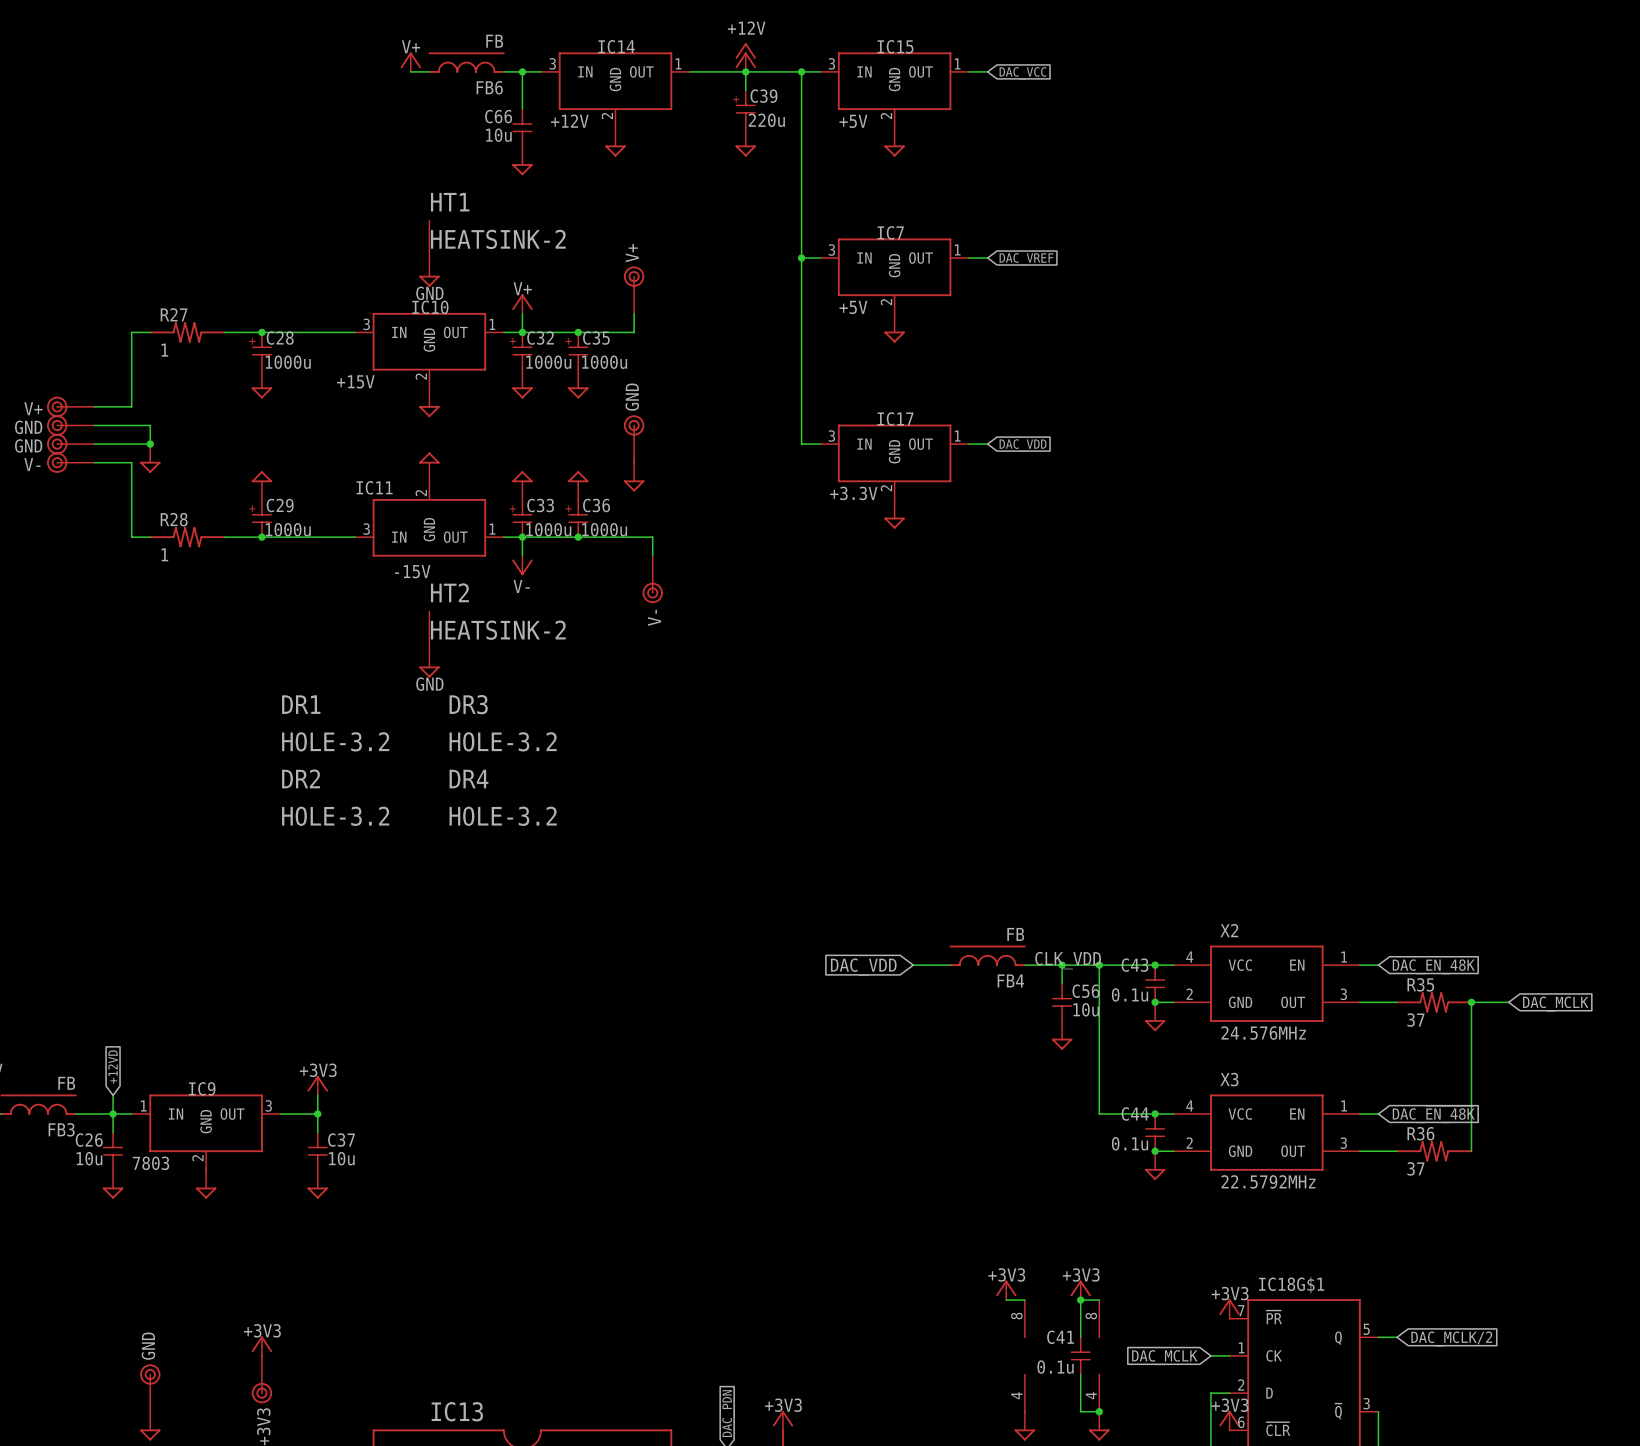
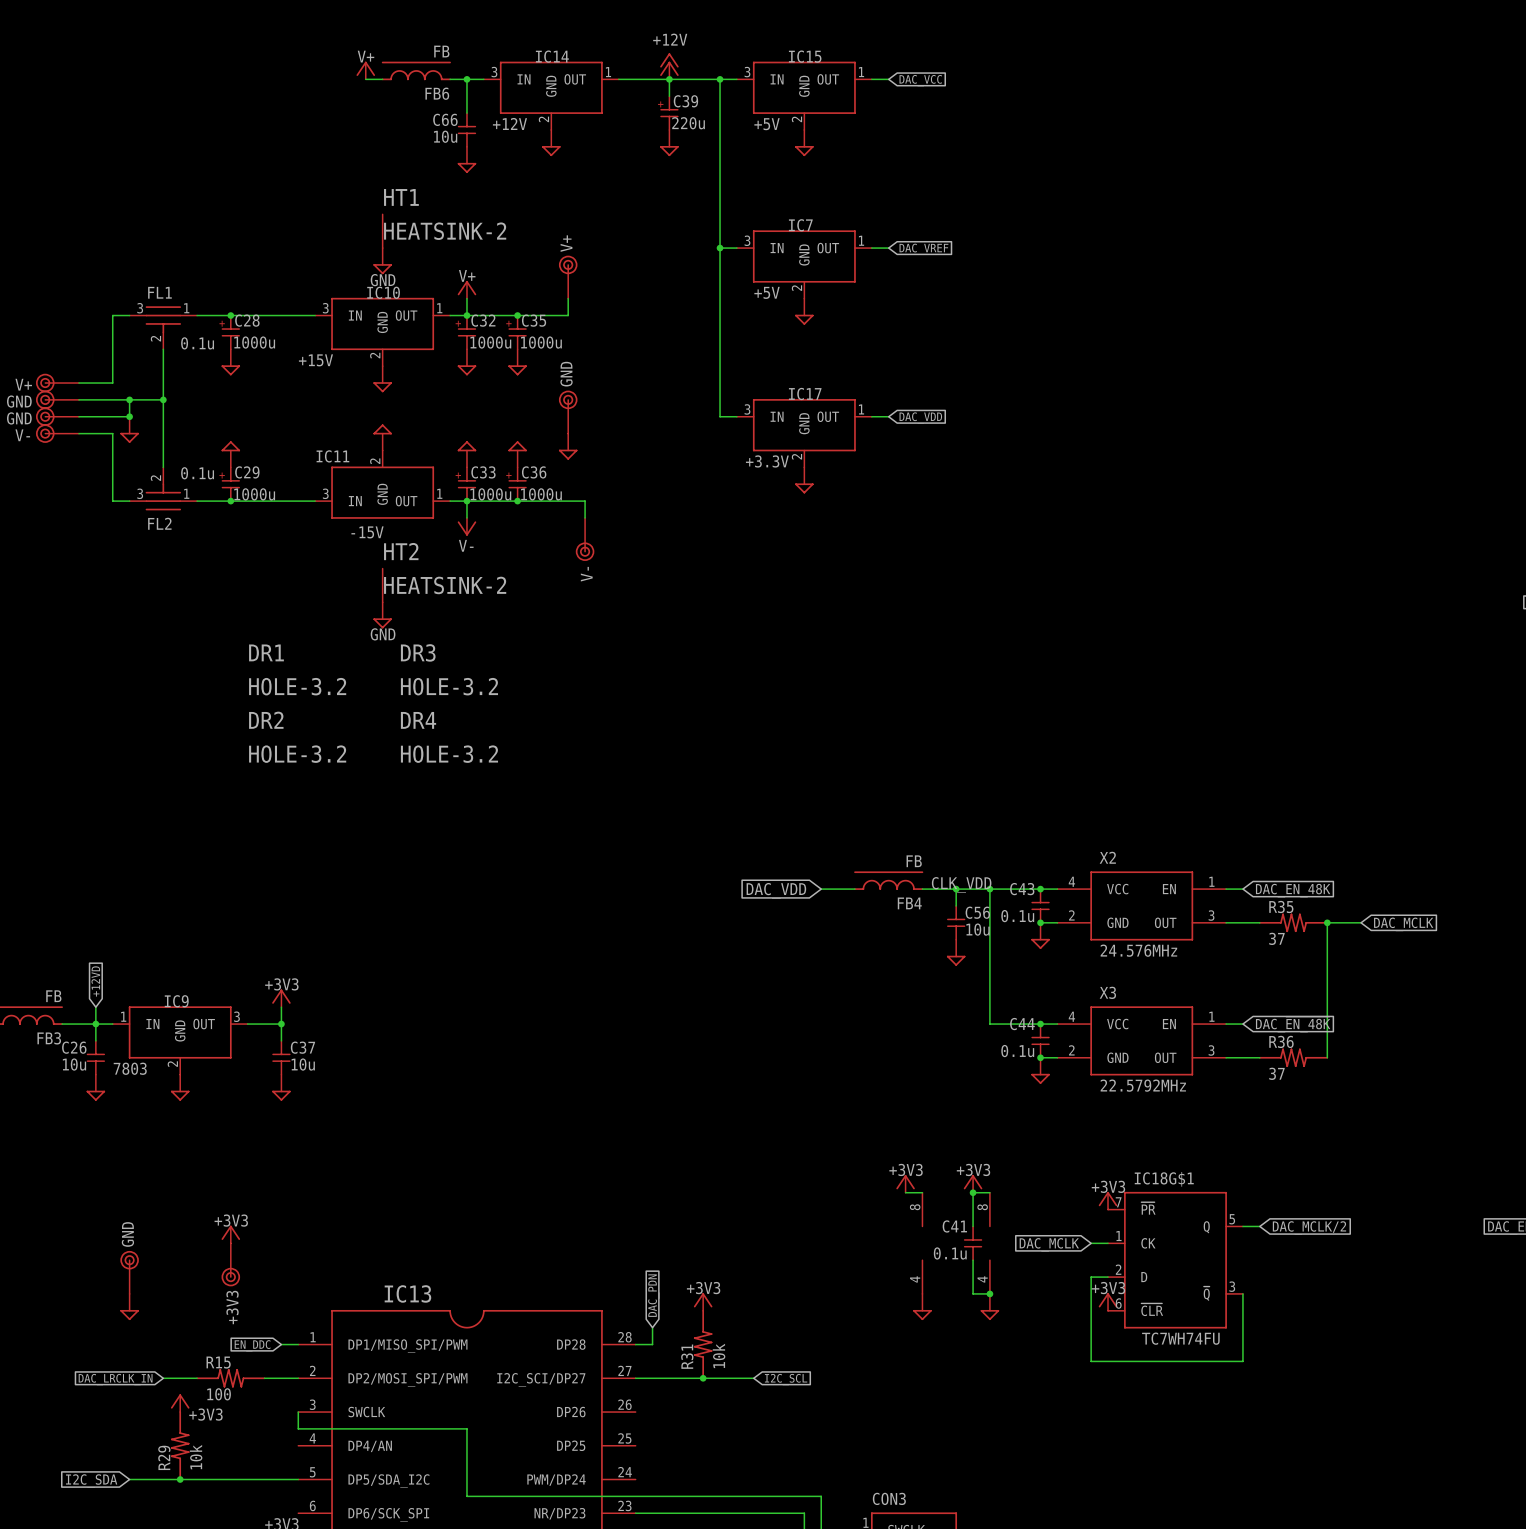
R27: 1 (187, 332) -> none
FL1: none -> 0.1u (163, 327)
wire: none -> (163, 349) (163, 467)
wire: none -> (129, 399) (163, 399)
junction: none -> (129, 399)
junction: none -> (163, 399)
FL2: none -> 0.1u (163, 488)
R28: 1 (187, 537) -> none

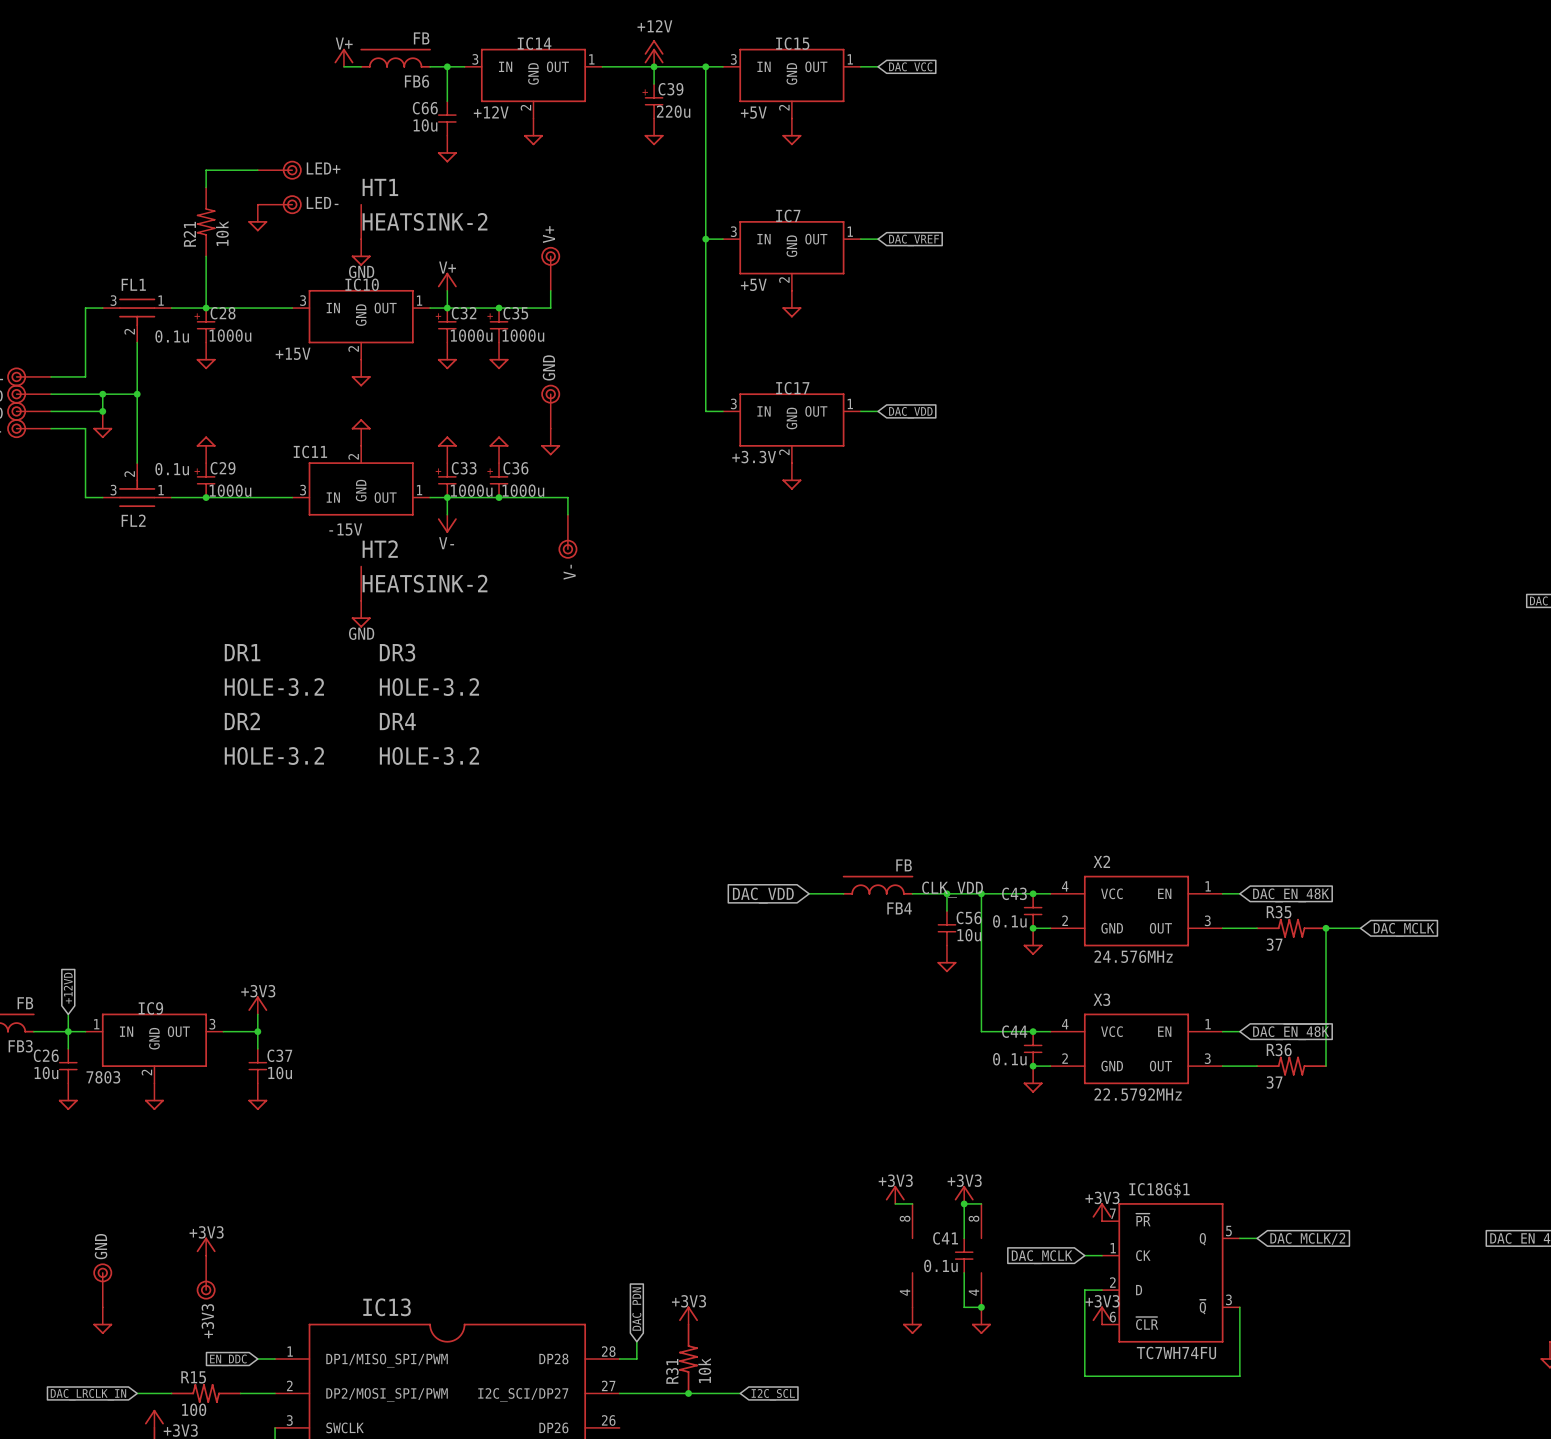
wire: none -> (257, 170) (206, 170) (206, 187)
part: none -> LED+ (279, 170)
part: none -> LED- (279, 204)
power symbol: none -> (257, 218)
R21: none -> 10k (206, 221)
wire: none -> (206, 256) (206, 308)

